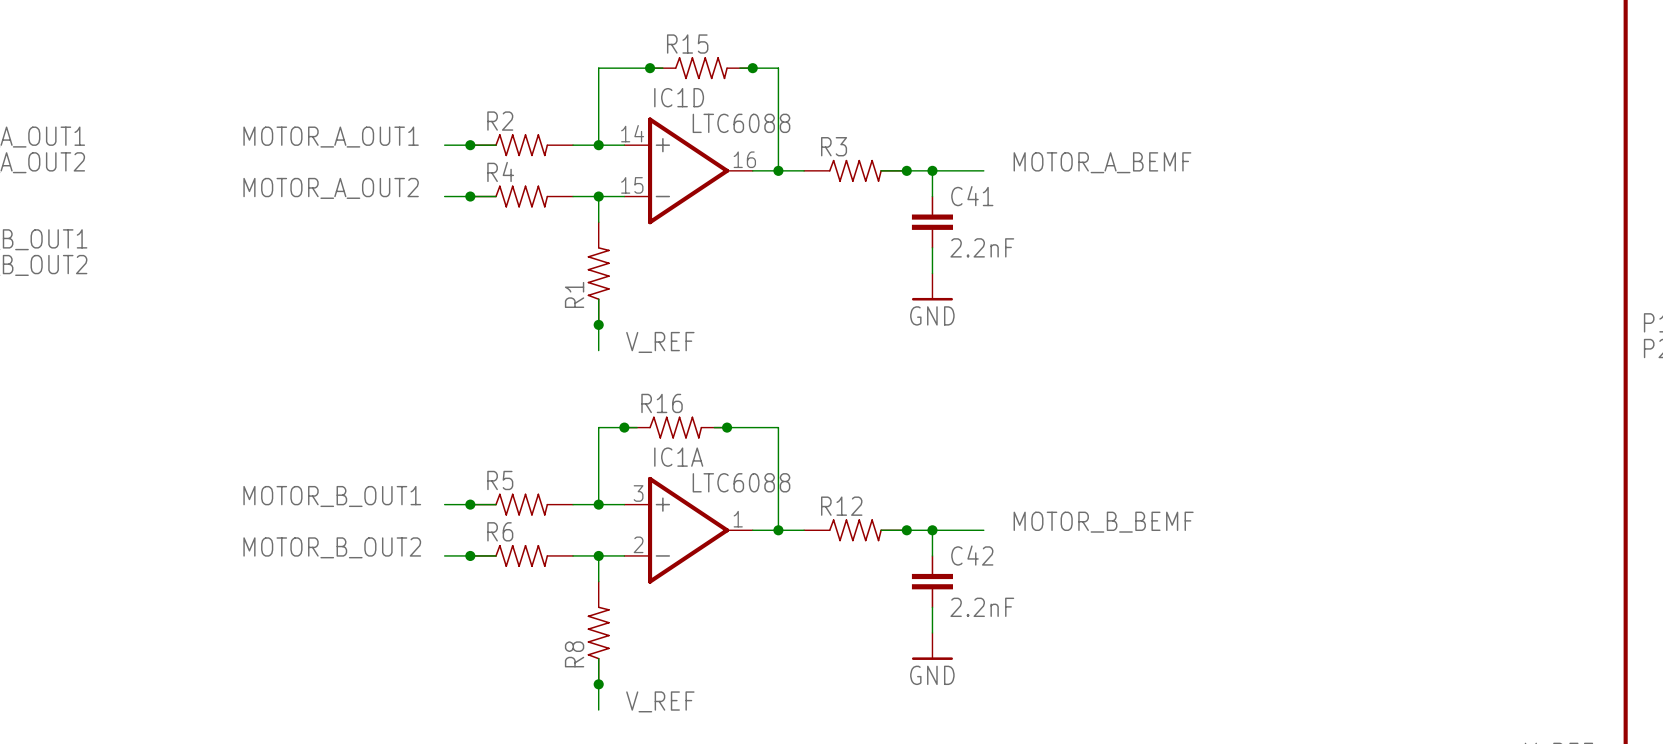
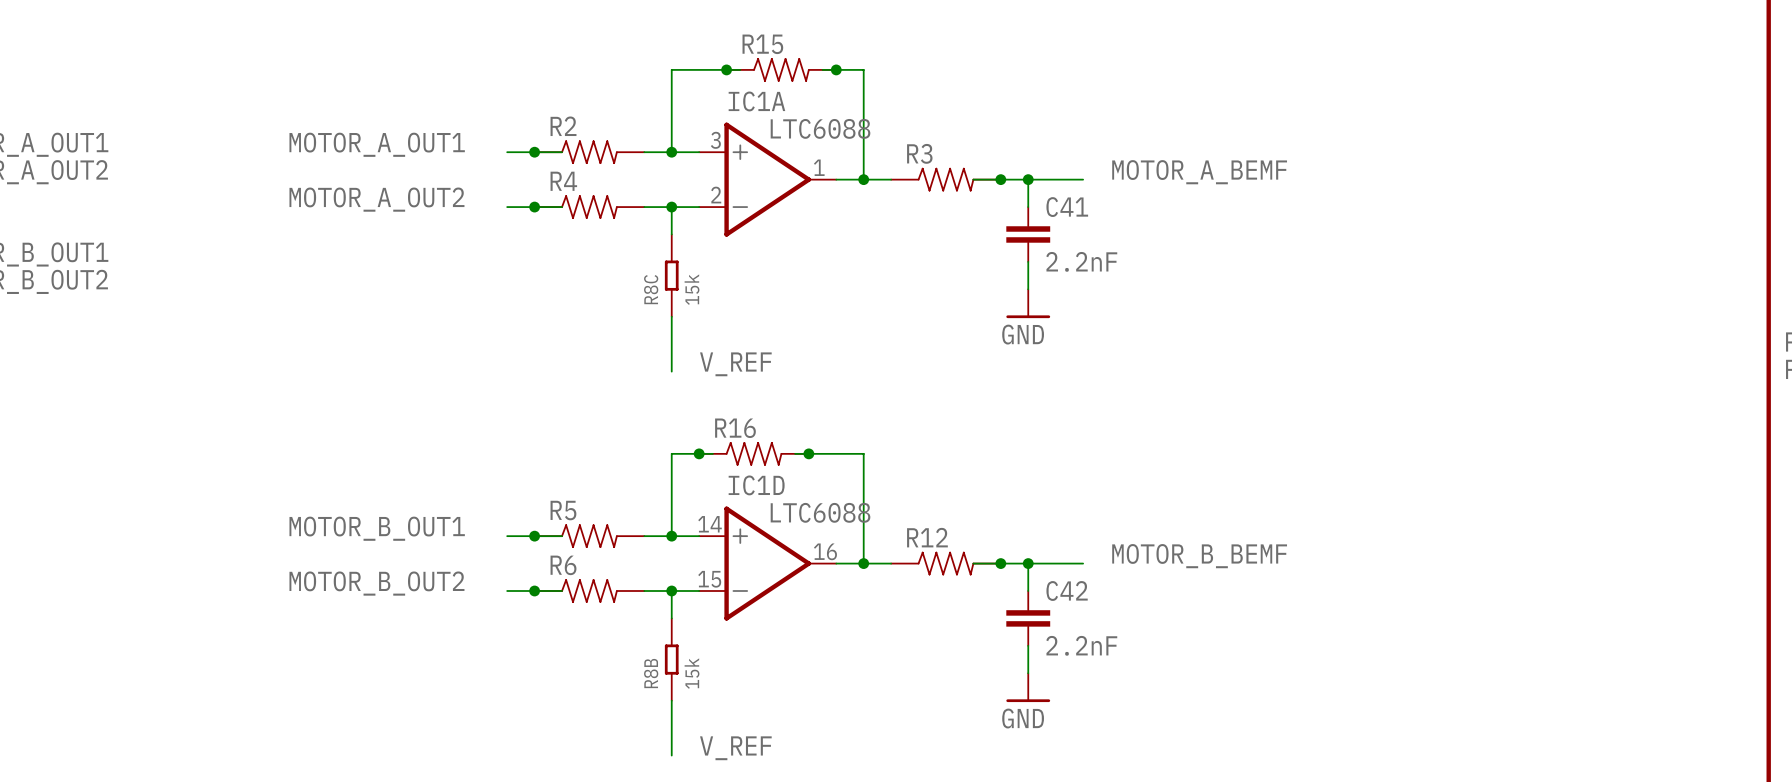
IC1D position: (688, 170) -> (767, 563)
R8C: none -> 15k (671, 275)
R1: (598, 273) -> none
junction: (598, 324) -> none
IC1A position: (688, 530) -> (767, 179)
R8B: none -> 15k (671, 659)
R8: (598, 632) -> none
junction: (598, 684) -> none

